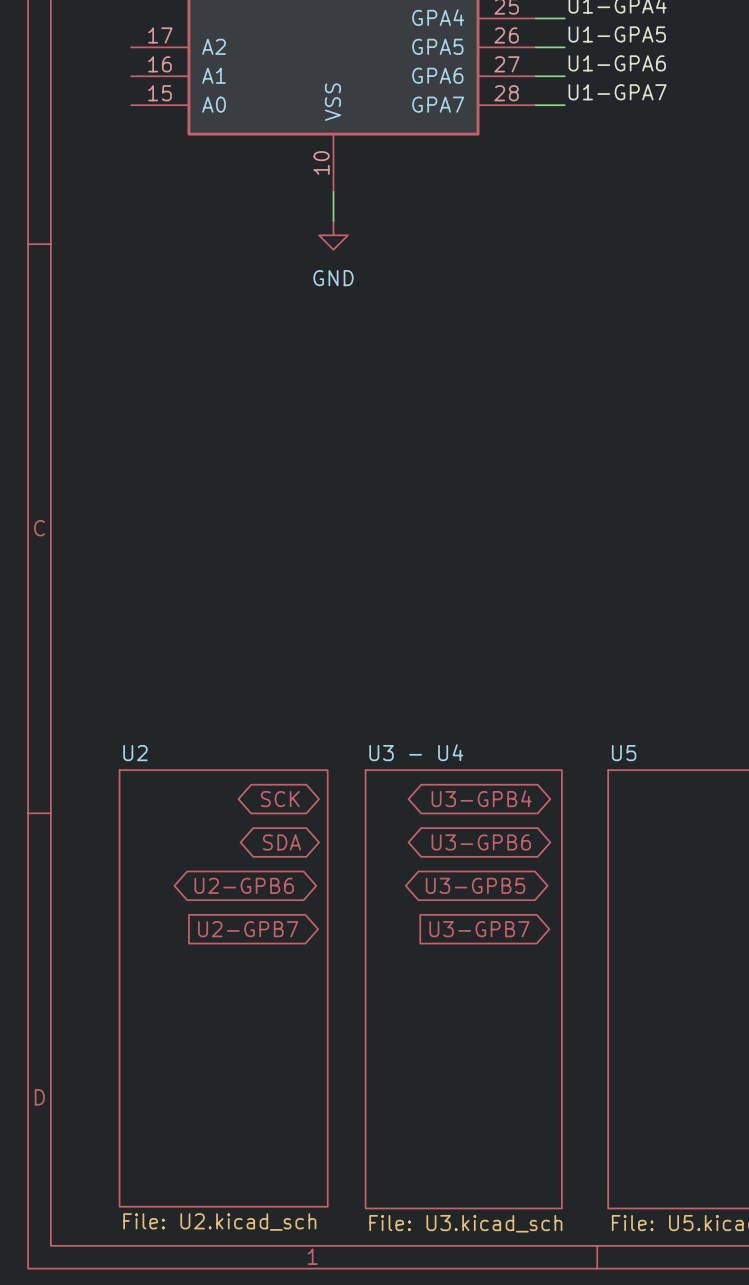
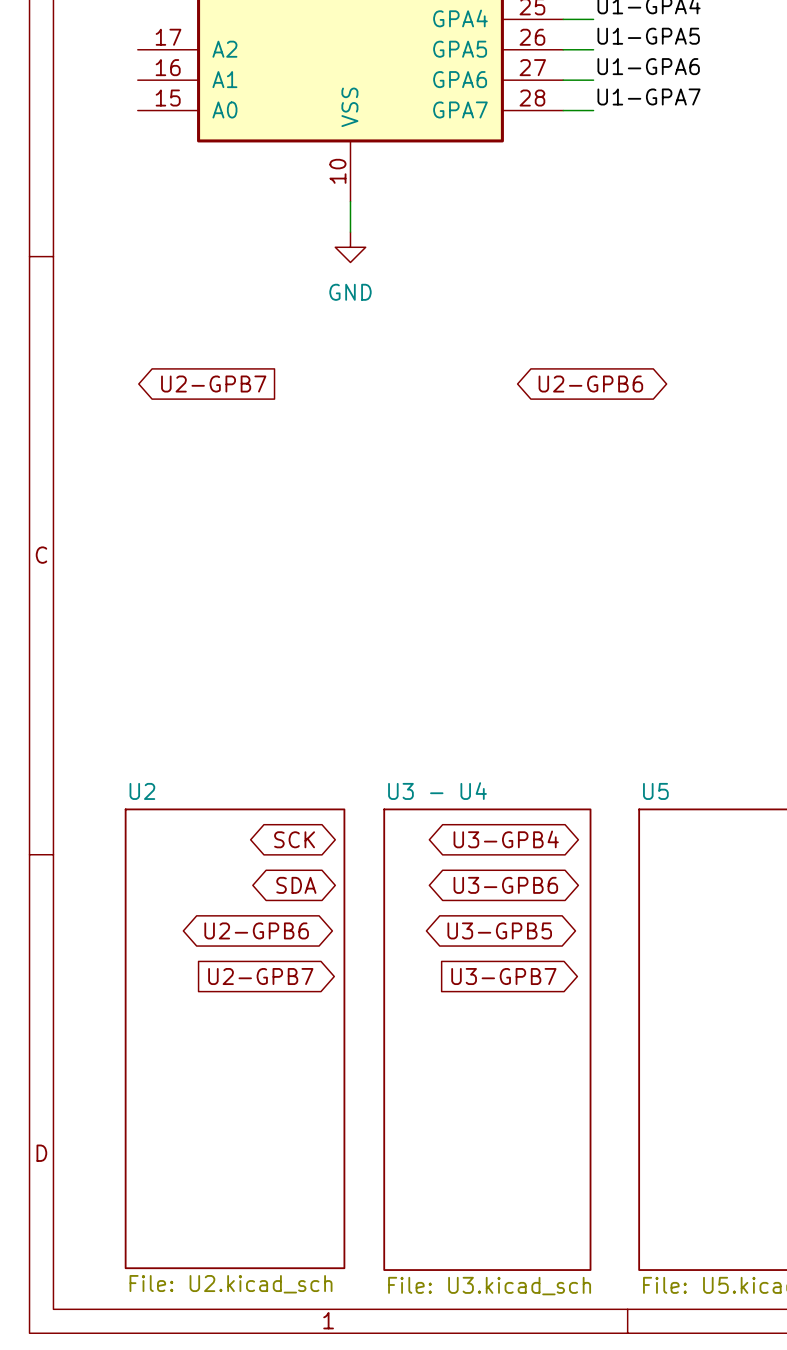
global label: none -> U2-GPB7 (213, 384)
global label: none -> U2-GPB6 (590, 384)

